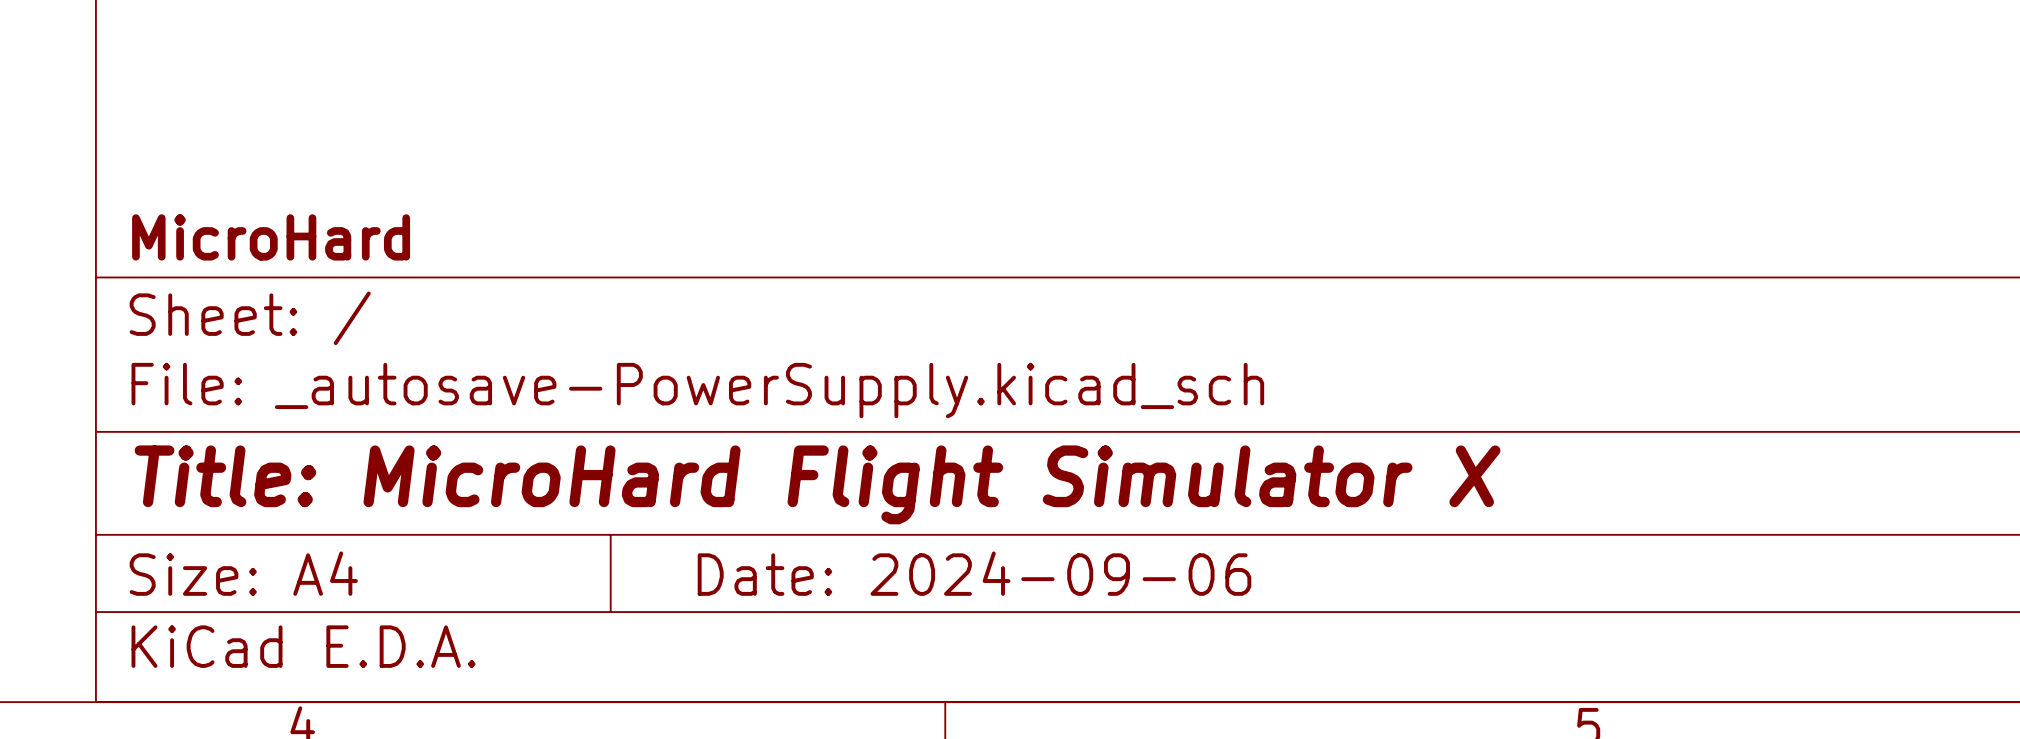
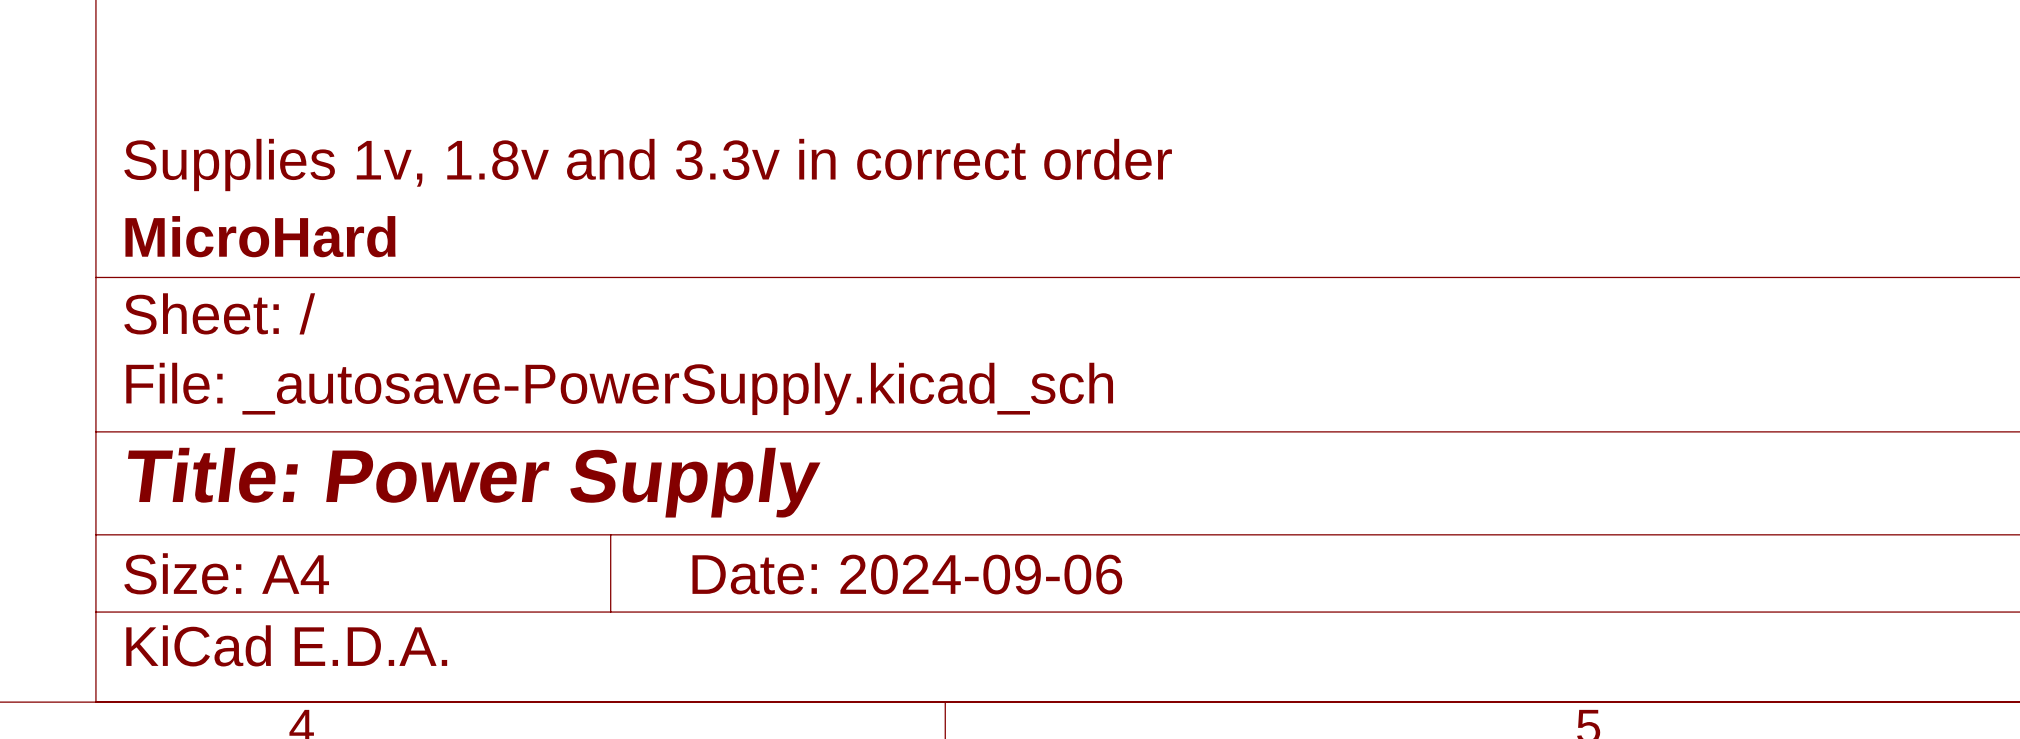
title block: none -> Supplies 1v, 1.8v and 3.3v in correct order (648, 165)
title block: Title: MicroHard Flight Simulator X (817, 484) -> Title: Power Supply (474, 482)

